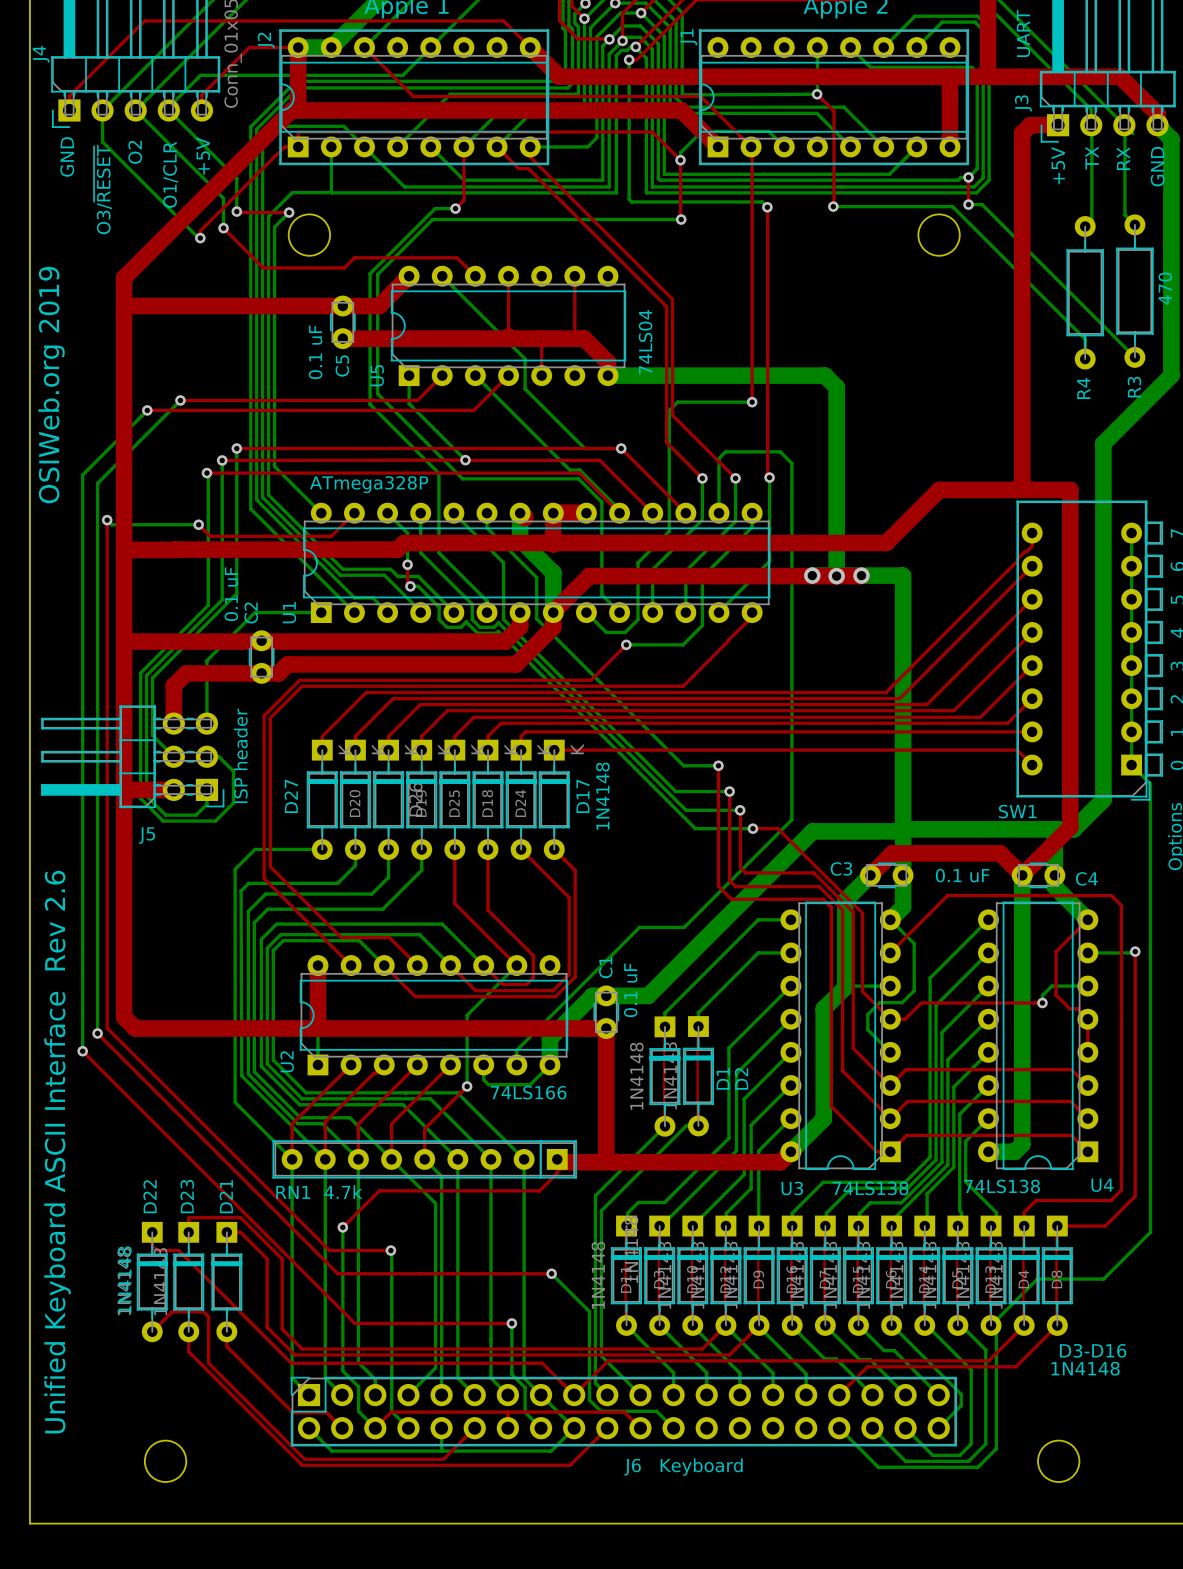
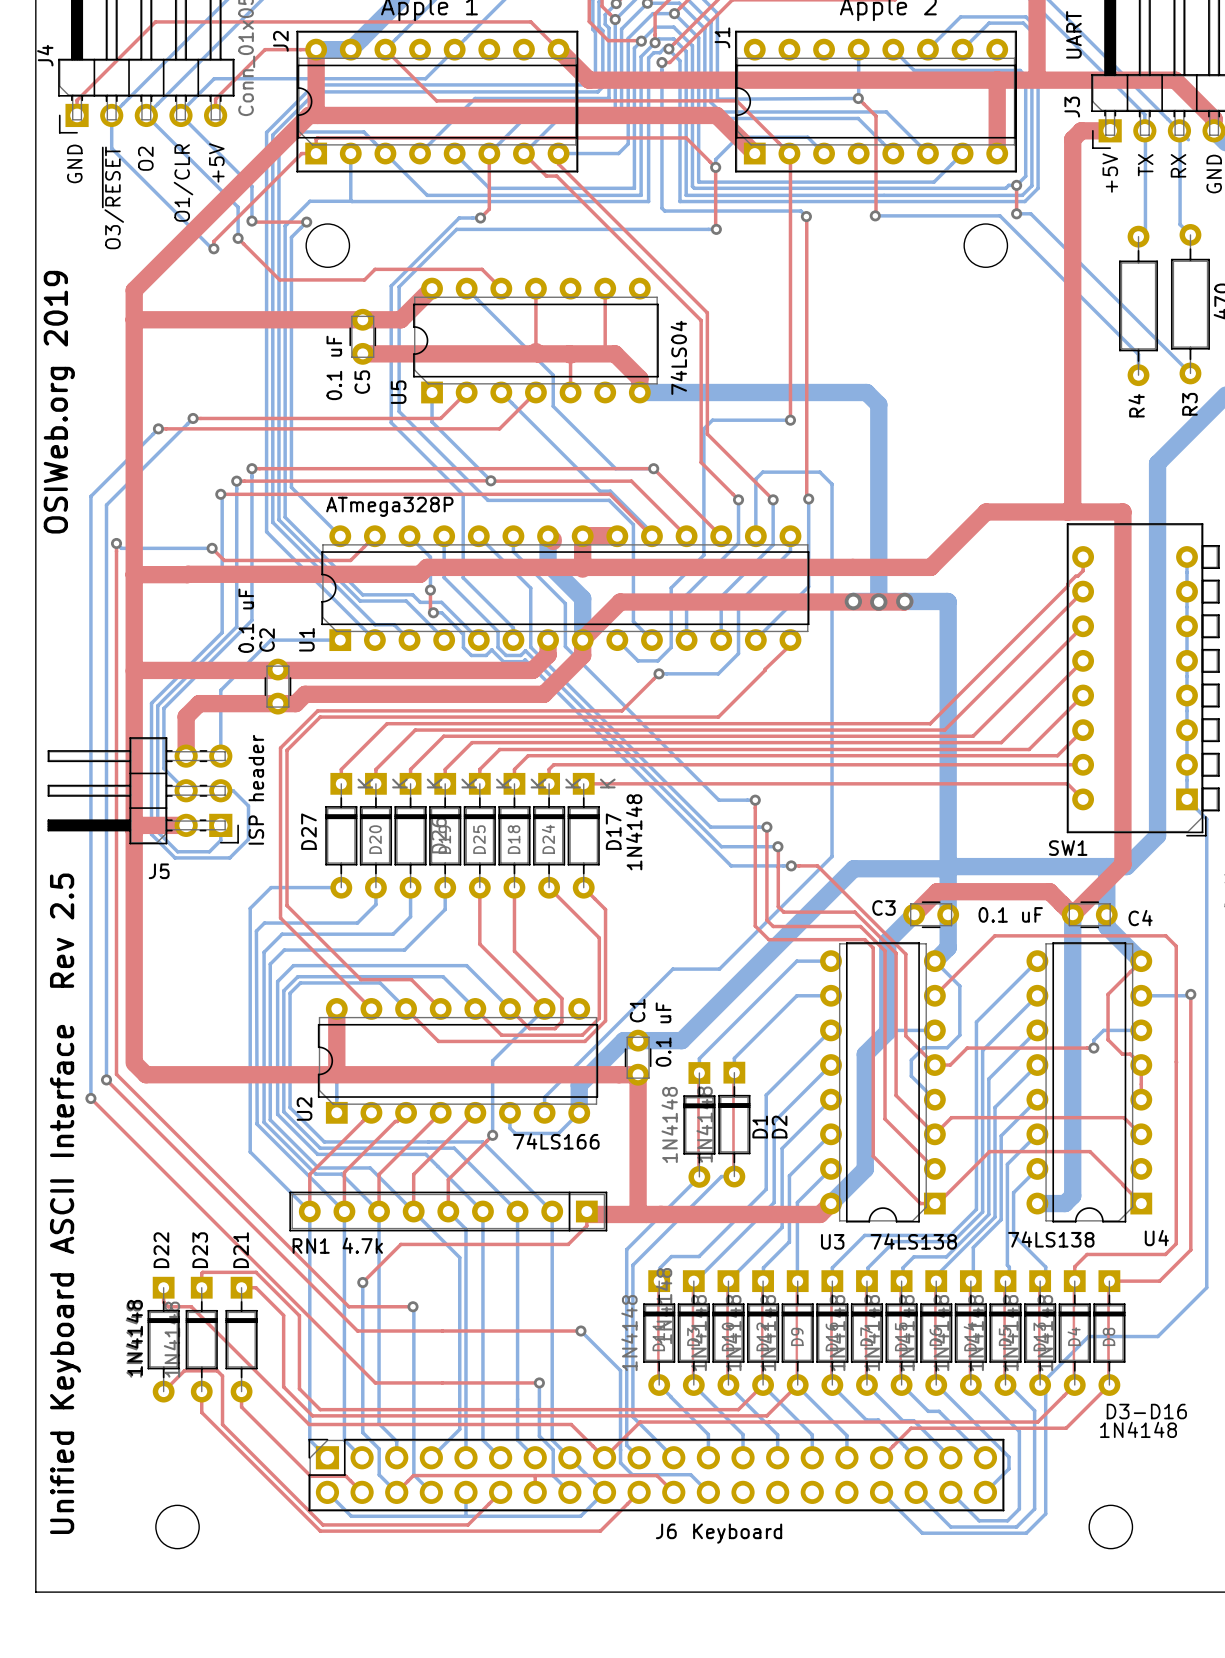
top track: (890, 1118) (907, 1101) (1070, 1101) (1087, 1118) -> none
top track: (1071, 1135) (906, 1135) (890, 1151) -> (1124, 1186) (1090, 1151) (989, 1151) (936, 1203)
text: Unified Keyboard ASCII Interface Rev 2.6 (57, 1152) -> Unified Keyboard ASCII Interface Rev 2.5 (65, 1203)

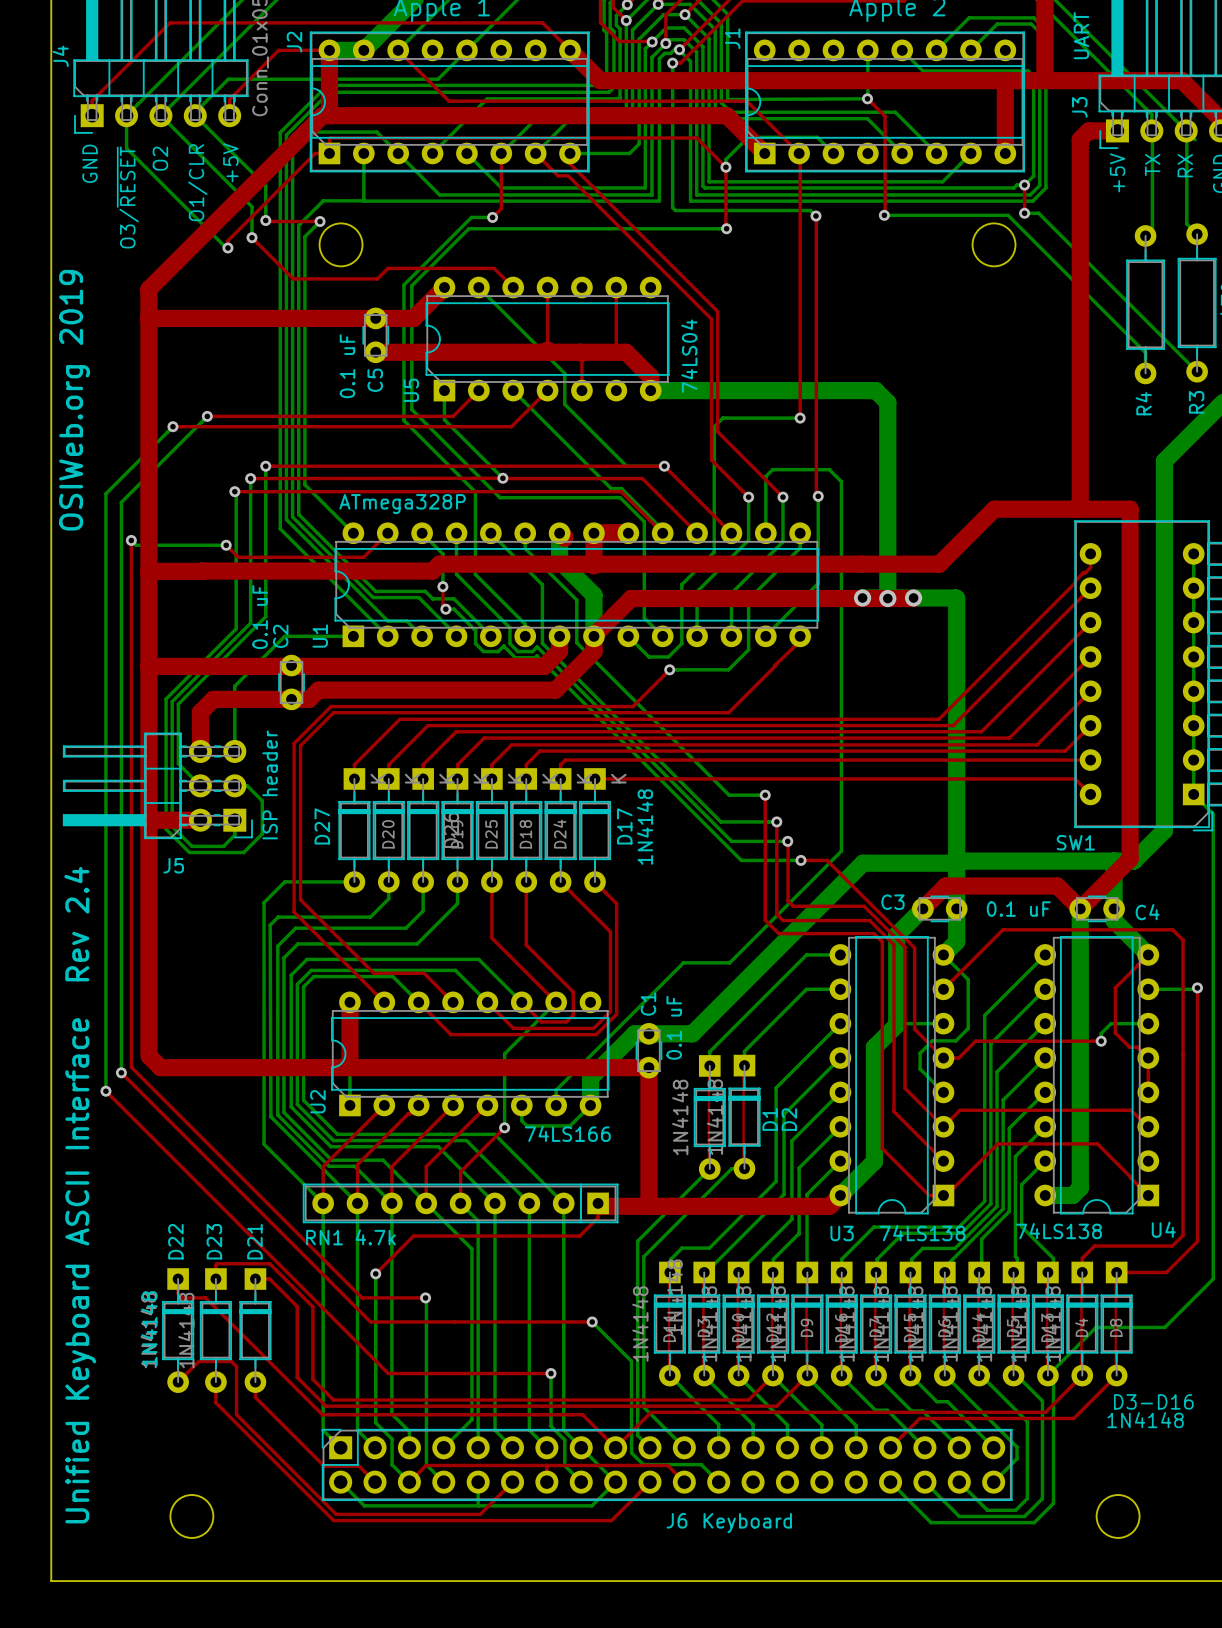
text: Unified Keyboard ASCII Interface Rev 2.5 (65, 1203) -> Unified Keyboard ASCII Interface Rev 2.4 (80, 1195)

